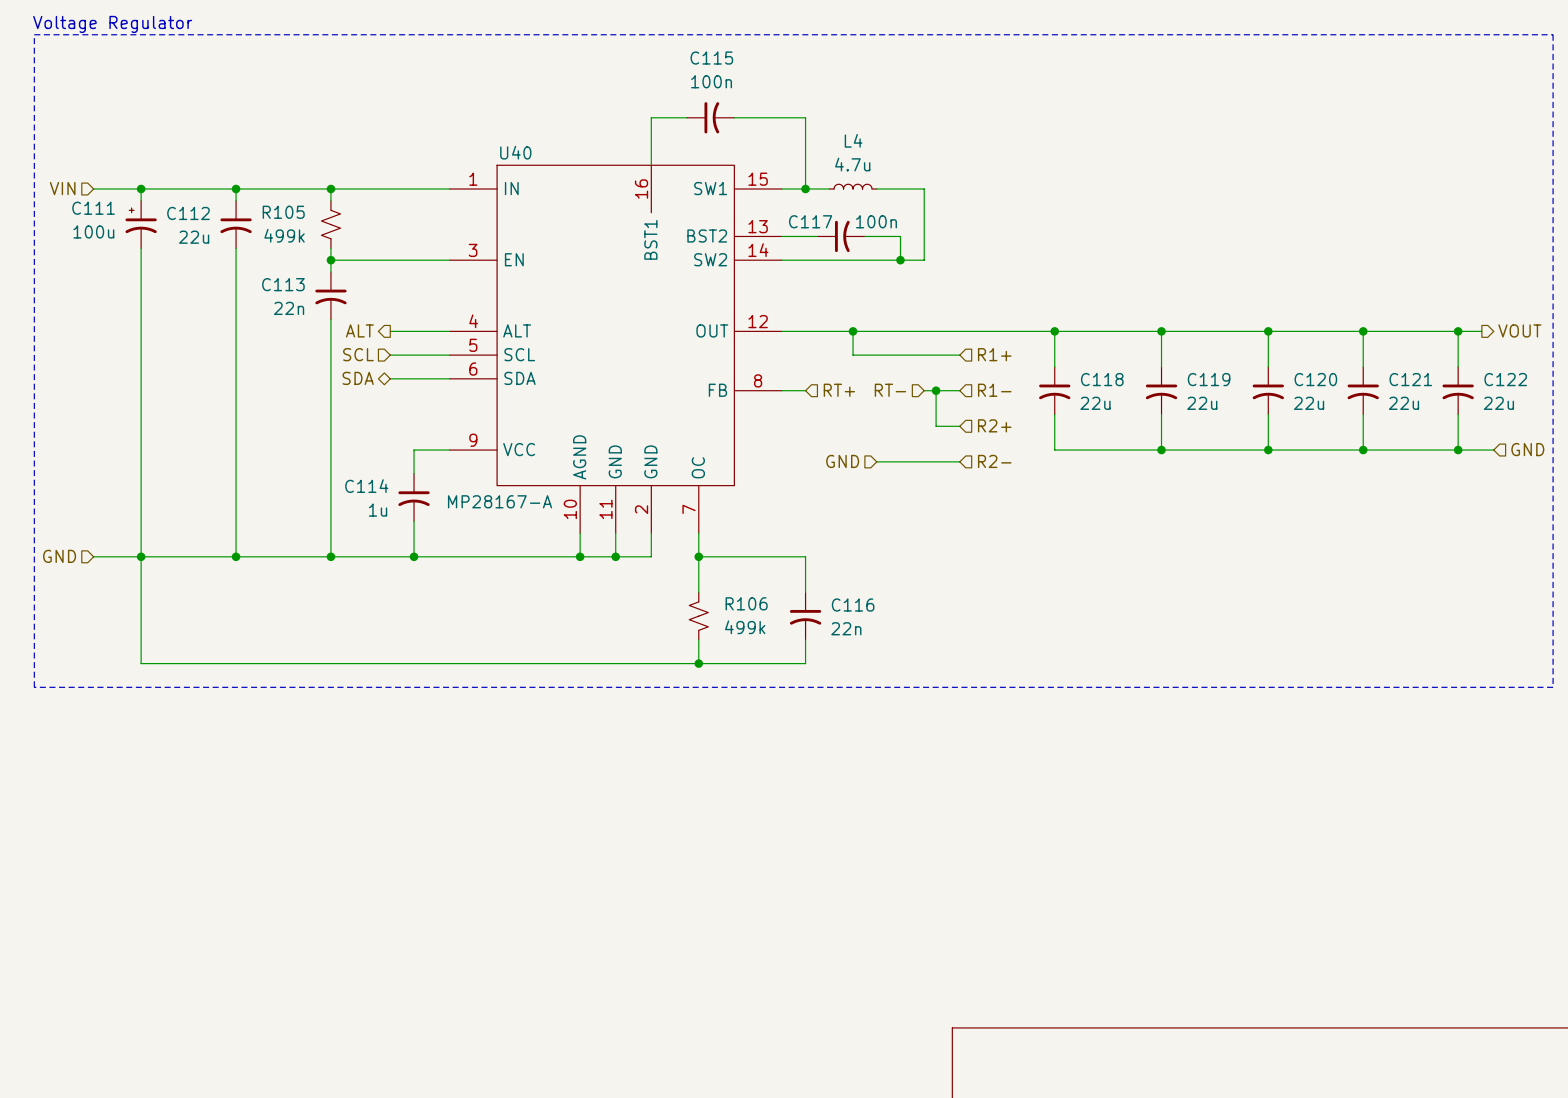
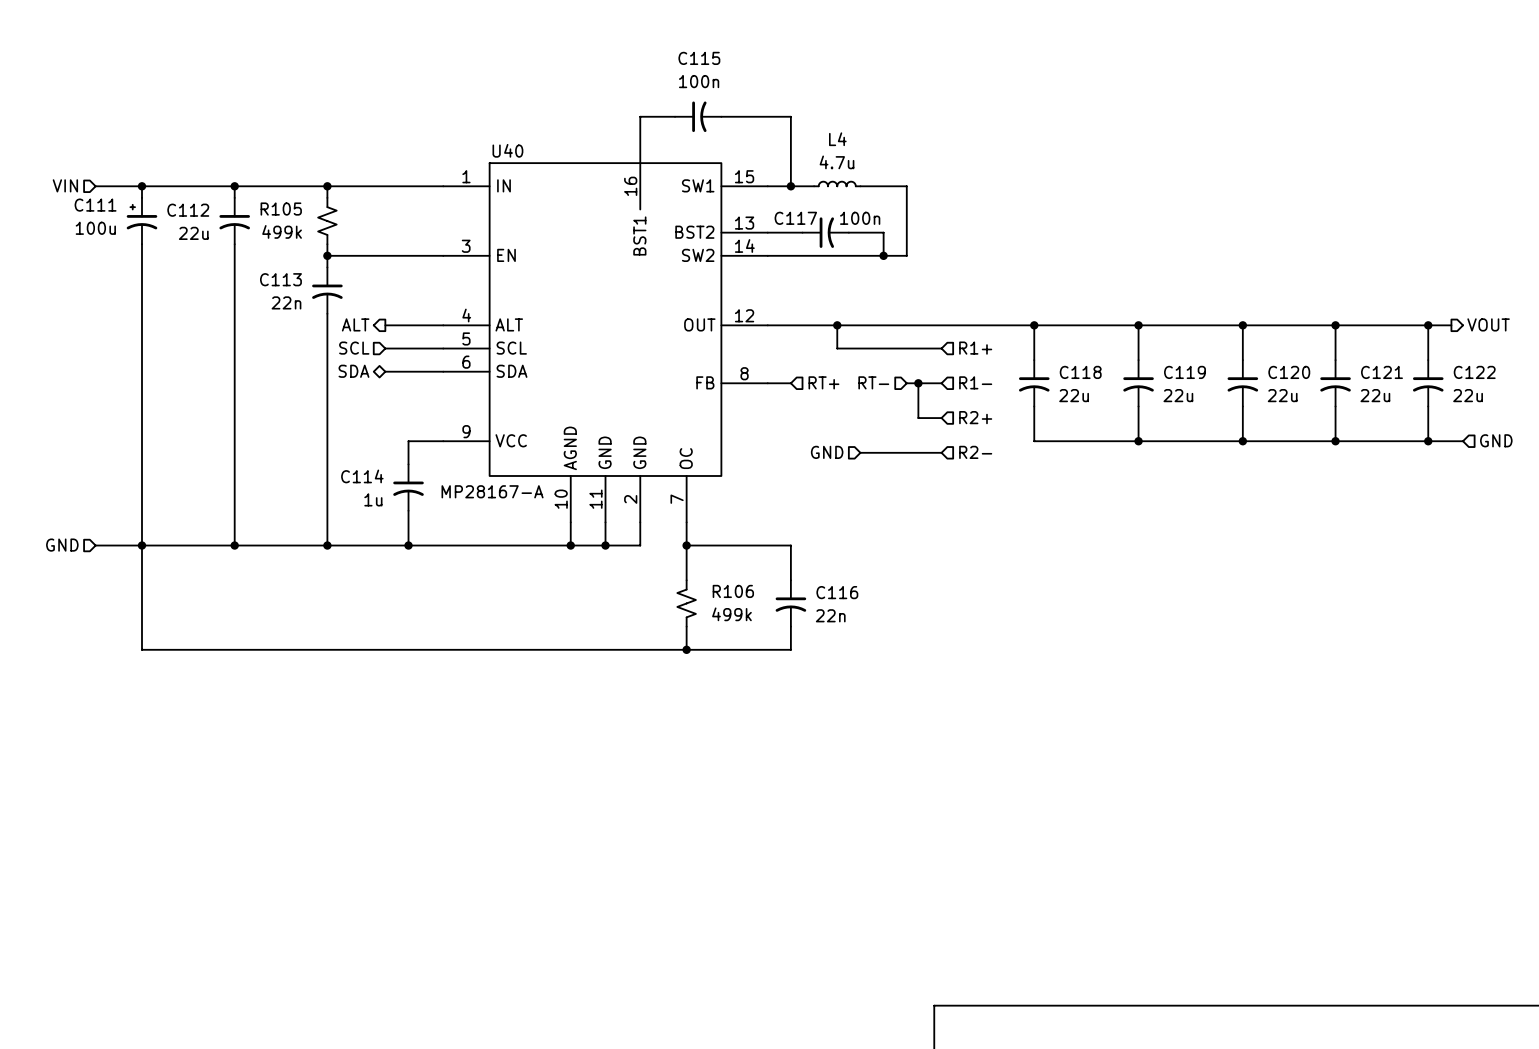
text: Voltage Regulator (112, 24) -> none
line: (34, 34) (1553, 34) (1553, 687) (34, 687) (34, 34) -> none

